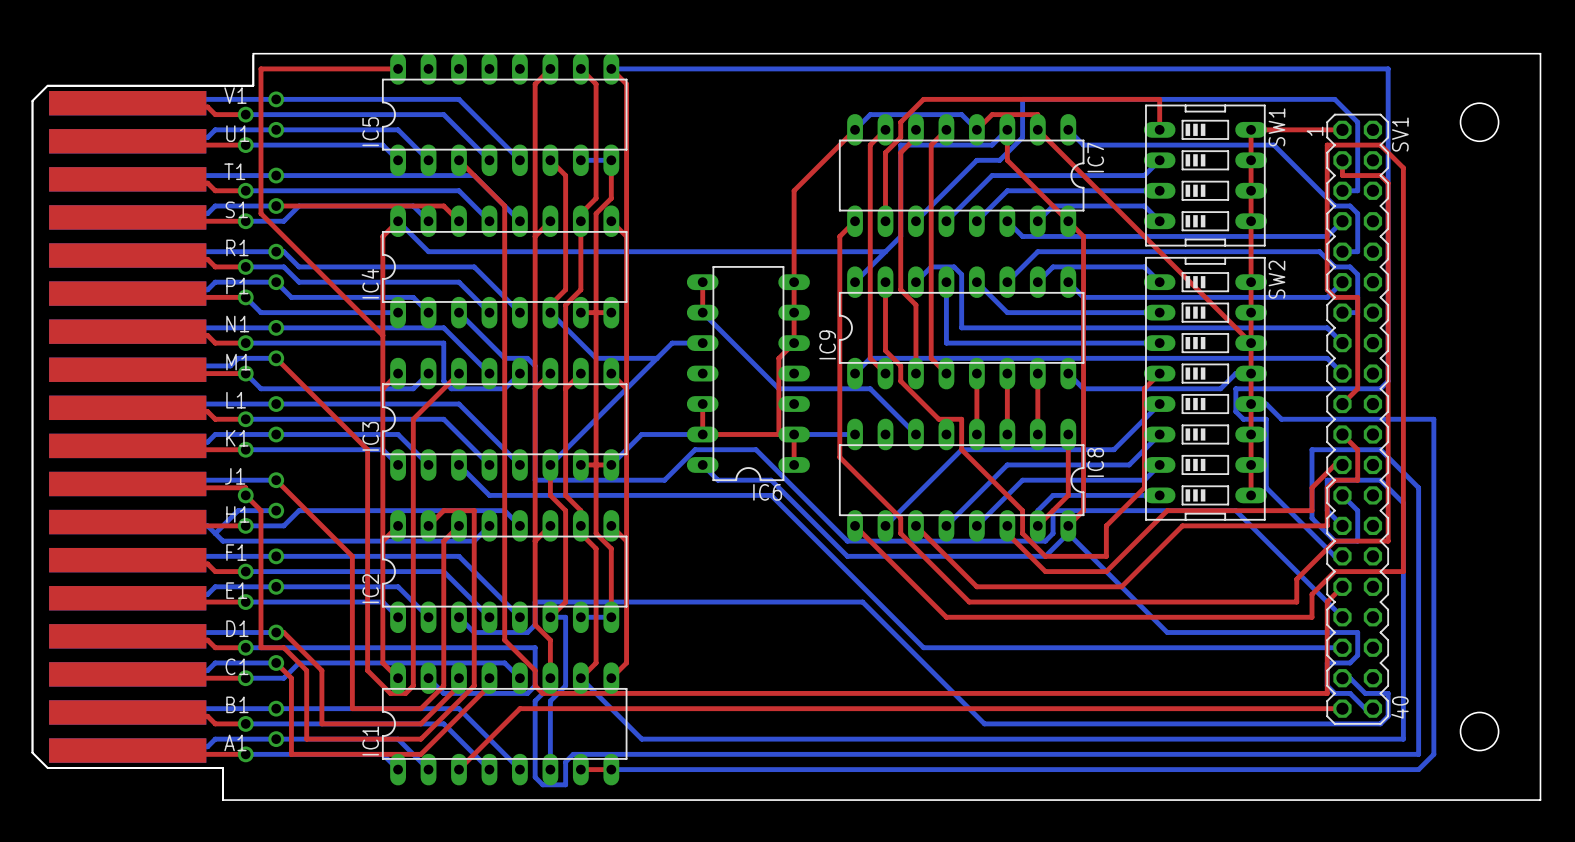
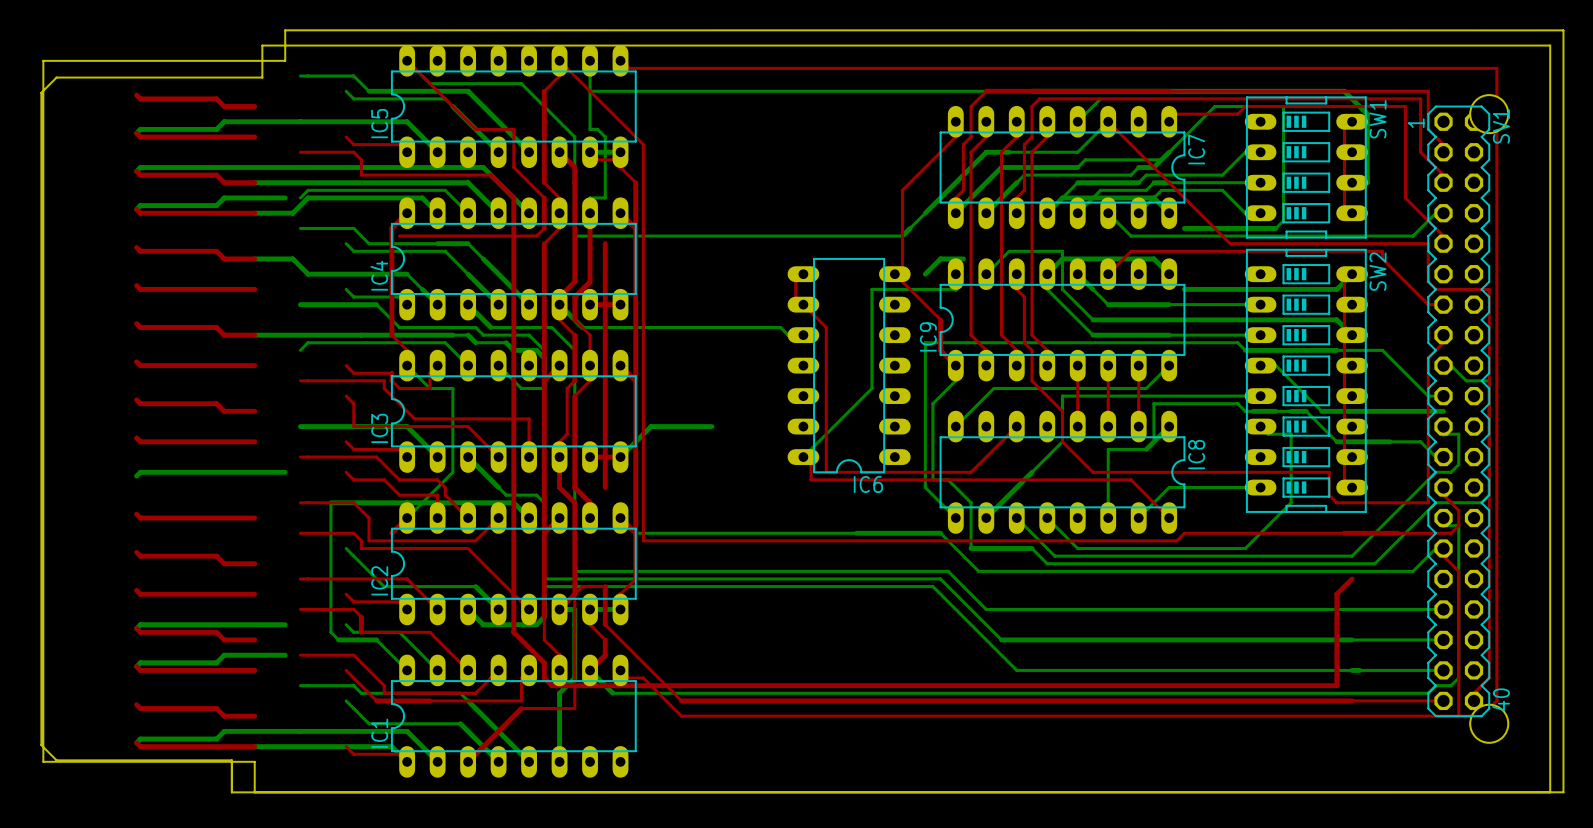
board edge: none -> (285, 30) (1563, 30) (1563, 792) (254, 792) (254, 761) (43, 761) (43, 60) (285, 60) (285, 30)
top track: (398, 68) (260, 68) (260, 213) (382, 335) -> none
top track: (550, 68) (535, 84) (535, 99) -> none
bottom track: none -> (590, 60) (590, 129) (597, 129) (605, 137) (605, 197) (590, 197) (590, 213)
top track: (580, 68) (596, 84) (596, 198) (580, 213) (580, 221) -> none
bottom track: (611, 68) (1388, 68) (1388, 381) (1380, 388) (1235, 388) (1235, 411) (1243, 419) -> (1153, 441) (1153, 403) (1237, 403) (1245, 411) (1253, 411)
top track: (618, 76) (626, 84) (626, 190) -> (628, 68) (1496, 68) (1496, 700) (1481, 716) (681, 716) (643, 678) (628, 678) (620, 670)
bottom track: (359, 99) (131, 99) (127, 103) -> (369, 91) (353, 76) (300, 76)
bottom track: none -> (590, 91) (1032, 91)
top track: (976, 99) (923, 99) (900, 122) (900, 137) (885, 152) (885, 221) -> (986, 91) (971, 106) (971, 137) (963, 144) (963, 190) (955, 197) (955, 213)
bottom track: (1022, 99) (1022, 137) (999, 160) -> (1108, 121) (1077, 152) (1009, 152)
top track: (1159, 99) (1159, 129) -> (1169, 91) (1428, 91) (1428, 129) (1443, 144) (1443, 152)
bottom track: (245, 114) (443, 114) -> (346, 91) (353, 98) (445, 98) (452, 106)
bottom track: (855, 129) (870, 114) (961, 114) (976, 129) -> none
top track: (855, 129) (794, 190) (794, 343) (778, 358) (778, 434) -> none
top track: (885, 129) (870, 145) (870, 358) (885, 373) -> none
top track: (915, 129) (915, 137) (900, 152) (900, 289) (915, 305) (915, 373) -> none
top track: (946, 129) (931, 145) (931, 327) -> (955, 121) (955, 137) (902, 190) (902, 266) (894, 274) (940, 319)
top track: (976, 129) (992, 114) (1037, 114) (1037, 129) (1251, 343) -> (986, 121) (986, 137) (971, 152) (971, 335) (986, 350) (986, 365)
bottom track: (1007, 129) (992, 145) (900, 145) (900, 236) -> (925, 213) (910, 228)
bottom track: (1068, 129) (1083, 145) (1273, 145) (1334, 206) (1350, 206) (1357, 213) (1357, 251) (1342, 251) -> (1077, 121) (1100, 98)
top track: none -> (1108, 121) (1230, 243) (1428, 243) (1428, 281) (1435, 289) (1489, 289) (1489, 678) (1473, 693) (1473, 700)
top track: none -> (1169, 121) (1176, 114) (1237, 114) (1245, 106) (1405, 106) (1405, 197) (1443, 236) (1443, 243)
top track: (1342, 129) (1251, 129) (1251, 495) -> (1352, 121) (1344, 129) (1344, 144) (1352, 152) (1344, 159) (1344, 175) (1352, 182) (1344, 190) (1344, 205) (1352, 213)
bottom track: (245, 145) (382, 145) (398, 160) -> none
top track: none -> (346, 137) (353, 144) (399, 144) (407, 152)
top track: (1007, 145) (1007, 160) (1083, 236) (1083, 510) (1068, 525) -> (1016, 137) (1001, 152) (1001, 335) (1016, 350) (1016, 365)
top track: (459, 160) (481, 183) -> (300, 152) (353, 152) (361, 159) (361, 175) (490, 175)
top track: none -> (590, 152) (597, 159) (612, 159) (620, 152)
bottom track: none -> (1260, 152) (1245, 152) (1222, 175) (1146, 175) (1138, 182)
top track: (1342, 160) (1342, 175) (1380, 175) (1388, 183) (1388, 541) -> (1443, 487) (1443, 495) (1458, 510) (1458, 525) (1451, 533) (1397, 533)
top track: (611, 175) (611, 198) (596, 213) (596, 251) -> (620, 167) (635, 182)
IC7 position: (961, 175) -> (1062, 167)
bottom track: (1068, 175) (1129, 175) -> (1077, 167) (1085, 159) (1161, 159)
bottom track: none -> (1138, 167) (1131, 175) (1024, 175) (1016, 182)
SW1 position: (1205, 175) -> (1306, 167)
top track: (535, 190) (535, 206) -> (407, 60) (475, 129) (513, 129) (513, 167) (544, 197)
bottom track: (1007, 190) (1068, 190) -> (1062, 197) (1077, 182)
bottom track: (1129, 190) (1144, 190) -> (1077, 213) (1100, 190) (1146, 190) (1153, 182)
bottom track: none -> (1169, 182) (1260, 182)
top track: none -> (1443, 182) (1443, 175) (1420, 152) (1420, 98) (1039, 98) (1032, 106) (1032, 137) (1024, 144) (1024, 190) (1016, 197) (1016, 213)
top track: (276, 206) (443, 206) (459, 221) -> none
bottom track: none -> (300, 197) (308, 190) (445, 190) (468, 213)
bottom track: (398, 221) (428, 251) -> (300, 228) (353, 228) (369, 243) (437, 243)
top track: (550, 221) (535, 236) (535, 251) -> (544, 182) (559, 197) (559, 228) (544, 243)
top track: (855, 221) (839, 236) (839, 457) (900, 518) (900, 533) (969, 602) (1296, 602) (1296, 579) (1334, 541) -> (544, 91) (559, 76) (559, 60) (643, 144) (643, 540) (1176, 540) (1184, 533) (1344, 533)
bottom track: (1007, 221) (1022, 236) (1174, 236) -> none
bottom track: none -> (1108, 213) (1131, 236) (1413, 236) (1435, 213) (1443, 213)
bottom track: none -> (1138, 213) (1161, 190) (1222, 190) (1245, 213) (1260, 213)
bottom track: (1342, 221) (1327, 236) (1266, 236) -> (1169, 152) (1214, 106) (1283, 106) (1283, 220) (1275, 228)
top track: none -> (544, 228) (536, 236) (399, 236)
bottom track: (893, 244) (855, 282) -> (902, 236) (574, 236) (574, 137) (521, 83) (430, 83) (407, 60)
bottom track: none -> (346, 243) (353, 251) (445, 251) (468, 274)
bottom track: (459, 251) (885, 251) -> none
bottom track: (127, 255) (131, 251) (283, 251) (299, 266) (474, 266) -> (468, 243) (483, 258)
bottom track: (954, 266) (961, 274) (961, 327) (1083, 327) -> none
bottom track: (398, 282) (459, 282) -> (407, 274) (422, 289)
top track: (702, 282) (702, 312) -> none
top track: (885, 282) (885, 350) (900, 365) (900, 381) (938, 419) (961, 419) (961, 449) (1022, 510) (1022, 533) (1045, 556) (1106, 556) (1106, 525) (1144, 487) (1144, 388) (1159, 373) -> none
bottom track: (976, 282) (1007, 312) (1098, 312) -> (986, 274) (1009, 251) (1062, 251) (1062, 289) (1092, 319)
bottom track: (1007, 282) (1037, 251) (1319, 251) (1334, 266) (1350, 266) (1357, 274) (1357, 312) (1342, 312) -> none
top track: none -> (1016, 274) (1016, 289) (1024, 297) (1024, 342) (1032, 350) (1032, 380) (1062, 411) (1062, 441) (1092, 472) (1329, 472) (1329, 495) (1336, 502) (1428, 502) (1428, 357) (1443, 342) (1443, 335)
top track: none -> (1108, 274) (1131, 251) (1382, 251) (1382, 258) (1428, 304) (1443, 304)
top track: none -> (1352, 274) (1344, 281) (1344, 297) (1352, 304) (1344, 312) (1344, 327) (1352, 335) (1344, 342) (1344, 357) (1352, 365) (1344, 373) (1344, 388) (1352, 396) (1344, 403) (1344, 418) (1352, 426) (1344, 434) (1344, 449) (1352, 457) (1344, 464) (1344, 479) (1352, 487)
bottom track: (127, 293) (131, 289) (207, 289) (215, 282) (276, 282) (291, 297) (413, 297) -> none
bottom track: (245, 297) (260, 312) (291, 312) -> none
bottom track: (946, 297) (946, 343) (1083, 343) -> (1047, 274) (1047, 289) (1092, 335)
bottom track: none -> (955, 289) (871, 289) (871, 388) (803, 457)
bottom track: (1083, 297) (1174, 297) -> (1092, 289) (1108, 304)
bottom track: (367, 312) (398, 312) -> (346, 289) (353, 297) (399, 297) (407, 304)
bottom track: none -> (376, 304) (399, 327) (475, 327) (483, 335) (529, 335) (544, 350) (544, 357)
bottom track: (702, 312) (778, 388) (870, 388) (915, 434) -> none
bottom track: none -> (1169, 304) (1260, 304)
top track: (565, 327) (565, 343) -> (559, 304) (559, 319) (574, 335)
IC9 position: (961, 327) -> (1062, 319)
bottom track: (127, 331) (131, 327) (443, 327) (459, 343) -> none
bottom track: (481, 335) (497, 350) -> (475, 342) (506, 342)
bottom track: none -> (490, 327) (551, 327) (574, 350) (574, 571) (948, 571) (986, 609) (1443, 609)
bottom track: (573, 335) (596, 358) (657, 358) -> (582, 327) (780, 327) (788, 335) (803, 335)
top track: (382, 343) (382, 381) -> (391, 335) (407, 350) (407, 365)
bottom track: (443, 343) (443, 381) (451, 388) (504, 388) (519, 373) -> (452, 335) (468, 335)
bottom track: (702, 343) (672, 343) (550, 464) -> none
bottom track: none -> (1169, 335) (1260, 335)
bottom track: (466, 350) (489, 373) -> (544, 388) (521, 388) (498, 365)
bottom track: (276, 358) (238, 358) (230, 365) (131, 365) (127, 369) -> none
top track: (276, 358) (367, 449) (367, 670) (390, 693) (405, 693) (413, 685) (413, 419) (459, 373) -> none
bottom track: none -> (300, 350) (308, 342) (445, 342) (468, 365)
bottom track: (1235, 358) (870, 358) (855, 373) -> none
bottom track: (1327, 358) (1342, 373) -> (1336, 350) (1382, 350) (1428, 396) (1443, 396)
bottom track: (245, 373) (260, 388) (413, 388) (428, 373) -> none
top track: none -> (346, 365) (353, 373) (391, 373)
bottom track: none -> (407, 365) (430, 388) (452, 388) (452, 472) (407, 518) (407, 502)
top track: (398, 373) (382, 388) (382, 662) (398, 678) -> none
top track: none -> (437, 365) (430, 373) (430, 388) (399, 388) (391, 380)
top track: (580, 373) (565, 388) (565, 404) -> (574, 319) (590, 335) (590, 380) (574, 396)
IC6 position: (748, 373) -> (849, 365)
top track: (976, 373) (976, 434) -> (1108, 365) (1108, 426)
top track: (1007, 373) (1007, 434) -> (803, 274) (795, 281) (795, 297) (826, 327) (826, 472) (971, 472) (1016, 426)
top track: (1037, 373) (1037, 434) -> (1047, 365) (1047, 350) (1032, 335) (1032, 152) (1047, 137) (1047, 121)
bottom track: (1068, 373) (1083, 388) (1220, 388) (1235, 373) (1251, 373) -> (1321, 411) (1275, 365) (1260, 365)
top track: none -> (1138, 365) (1138, 426)
bottom track: none -> (1169, 365) (1146, 388) (993, 388) (955, 426)
top track: none -> (300, 380) (384, 380) (384, 388) (414, 418) (529, 418) (529, 457)
top track: none -> (574, 380) (567, 388) (567, 434) (559, 441) (559, 457)
SW2 position: (1205, 388) -> (1306, 380)
bottom track: (535, 396) (535, 480) (664, 480) (695, 449) (756, 449) (847, 541) -> (620, 518) (635, 533) (856, 533)
top track: none -> (346, 396) (353, 403) (353, 426) (468, 426) (498, 457)
top track: (702, 404) (702, 434) (794, 434) (794, 464) -> (1169, 518) (1131, 479) (811, 479) (811, 464) (803, 457)
bottom track: (1159, 404) (1113, 449) (961, 449) (885, 525) -> none
bottom track: (1251, 404) (1266, 404) (1281, 419) -> (1275, 411) (1291, 411)
top track: (1342, 404) (1357, 388) (1357, 297) (1334, 297) (1327, 289) (1327, 145) (1380, 145) (1403, 167) (1403, 571) (1334, 571) (1312, 594) (1312, 617) (946, 617) (855, 525) -> none
bottom track: (127, 407) (131, 404) (459, 404) (519, 464) -> none
bottom track: (245, 419) (443, 419) (489, 464) -> none
bottom track: (1266, 419) (1266, 487) (1334, 556) (1342, 556) -> none
bottom track: (1296, 419) (1312, 419) -> (1306, 411) (1336, 441)
SV1 position: (1357, 419) -> (1458, 411)
bottom track: (1433, 419) (1433, 434) -> none
part: (260, 426) -> none
part: (142, 427) -> none
bottom track: (291, 434) (215, 434) (207, 442) (131, 442) (127, 445) -> none
bottom track: (794, 434) (855, 434) -> none
top track: (1068, 434) (1068, 495) (1037, 525) -> (1077, 426) (1077, 365)
top track: (1342, 434) (1357, 449) (1357, 480) (1334, 480) (1327, 487) (1327, 525) (1182, 525) (1121, 586) (976, 586) (915, 525) -> none
bottom track: (1433, 442) (1433, 525) -> (1443, 434) (1458, 434) (1458, 464) (1451, 472) (1435, 472) (1352, 556) (1054, 556) (1016, 518)
bottom track: (245, 449) (382, 449) (398, 464) -> none
top track: none -> (346, 441) (353, 449) (399, 449) (407, 457)
bottom track: (1327, 449) (1312, 449) (1312, 518) (1334, 541) (1357, 541) (1357, 510) (1342, 495) -> none
bottom track: (1380, 449) (1418, 487) (1418, 754) (573, 754) (565, 761) (565, 784) (542, 784) (535, 777) (535, 701) (550, 685) (550, 678) -> (1390, 441) (1420, 441) (1435, 457) (1443, 457)
bottom track: (1136, 457) (1129, 464) (1007, 464) (946, 525) -> (1245, 350) (1237, 342) (925, 342) (925, 487) (955, 518)
bottom track: none -> (1146, 449) (1108, 449) (1108, 518)
top track: none -> (300, 457) (376, 457) (399, 479) (437, 479) (445, 487) (445, 495) (468, 518)
bottom track: (702, 464) (717, 480) (771, 480) (847, 556) (961, 556) -> (955, 365) (955, 380) (932, 403) (932, 479) (948, 479) (971, 502) (971, 548)
bottom track: (1159, 464) (1144, 480) (1022, 480) -> (1260, 396) (1062, 396) (1062, 441) (1032, 472)
top track: (1342, 464) (1334, 464) (1312, 487) (1312, 510) (1167, 510) (1106, 571) (1045, 571) (1007, 533) (1007, 525) -> none
top track: (276, 480) (352, 556) (352, 624) -> (300, 609) (353, 609) (361, 617)
IC8 position: (961, 480) -> (1062, 472)
top track: (127, 483) (131, 487) (245, 487) (245, 495) (260, 510) (260, 647) (283, 647) (306, 670) (306, 739) (420, 739) (474, 685) (474, 510) (443, 510) (428, 525) -> (346, 472) (353, 479) (384, 479) (399, 495) (437, 495) (437, 518)
bottom track: (489, 495) (771, 495) (923, 647) (992, 647) -> (498, 487) (506, 495) (536, 495) (544, 502) (544, 578) (940, 578) (1001, 639)
top track: (596, 495) (596, 533) (611, 548) (611, 602) -> none
bottom track: (1159, 495) (1053, 495) (1037, 510) (1037, 525) -> (1260, 426) (1268, 434) (1291, 434) (1291, 502) (1245, 548) (1077, 548) (1047, 518)
bottom track: none -> (1260, 487) (1169, 487) (1138, 518)
bottom track: (276, 510) (238, 510) (215, 533) -> none
top track: none -> (300, 502) (353, 502) (369, 518) (369, 540) (475, 540) (498, 518)
bottom track: (321, 510) (299, 510) (283, 525) (245, 525) -> (330, 502) (330, 632) (338, 639)
bottom track: (127, 522) (131, 525) (207, 525) (222, 541) (474, 541) (489, 525) -> none
top track: (459, 525) (443, 541) (443, 685) (420, 708) -> (529, 670) (521, 678) (521, 700) (430, 700)
top track: (580, 525) (580, 533) (596, 548) (596, 594) -> (521, 708) (574, 708) (574, 594) (582, 586) (605, 586)
bottom track: (1342, 525) (1327, 510) (1327, 480) (1380, 480) (1403, 503) (1403, 739) (641, 739) (603, 701) -> none
bottom track: (1433, 533) (1433, 754) (1418, 769) (611, 769) -> (1443, 525) (1458, 525) (1458, 678) (1451, 685) (1435, 685) (1428, 693) (612, 693)
top track: none -> (300, 533) (353, 533) (361, 540) (361, 548) (468, 548) (529, 609)
bottom track: (931, 541) (1045, 541) (1053, 533) (1053, 510) (1235, 510) (1342, 617) -> (940, 533) (978, 571) (1413, 571) (1435, 548) (1443, 548)
bottom track: (1022, 556) (1045, 556) (1068, 533) (1167, 632) (1357, 632) (1357, 655) (1350, 662) (1327, 662) (1327, 685) (1334, 693) (1350, 693) (1365, 708) (1372, 708) -> (1032, 548) (1047, 563) (1374, 563) (1435, 502) (1481, 502) (1489, 495) (1489, 380) (1466, 380) (1451, 365) (1443, 365)
top track: none -> (1443, 548) (1443, 556) (1458, 571) (1458, 716)
bottom track: (127, 560) (131, 556) (459, 556) (519, 617) -> none
bottom track: (245, 571) (443, 571) (466, 594) -> (346, 548) (384, 586) (475, 586)
top track: none -> (300, 578) (407, 578) (437, 609)
top track: (626, 586) (626, 662) (611, 678) -> (635, 578) (620, 594)
bottom track: (127, 598) (131, 594) (207, 594) (215, 586) (398, 586) (428, 617) -> none
bottom track: (245, 602) (382, 602) (398, 617) -> none
top track: none -> (346, 594) (353, 601) (399, 601) (407, 609)
bottom track: (535, 602) (862, 602) (984, 723) (1380, 723) (1388, 716) (1388, 693) (1365, 693) (1350, 678) -> (544, 594) (544, 586) (932, 586) (1016, 670) (1352, 670)
top track: (535, 624) (550, 640) (550, 662) -> (544, 617) (544, 639) (559, 655)
top track: (276, 632) (283, 632) (321, 670) (321, 723) (420, 723) (459, 685) (459, 678) -> (361, 632) (430, 632) (468, 670)
bottom track: none -> (346, 624) (353, 632) (399, 632) (437, 670)
top track: (596, 632) (596, 647) -> (590, 609) (590, 624) (605, 639)
top track: (352, 640) (352, 708) (367, 708) -> (346, 670) (376, 700)
bottom track: (245, 647) (329, 647) -> none
bottom track: (367, 647) (535, 647) (535, 685) (527, 693) (443, 693) (428, 678) -> (376, 639) (407, 670)
bottom track: none -> (1352, 639) (1443, 639)
top track: (276, 662) (291, 678) (291, 754) (420, 754) (489, 685) (489, 678) -> (300, 655) (353, 655) (384, 685) (384, 693) (475, 693) (498, 670)
bottom track: (245, 678) (283, 678) (299, 662) (504, 662) (519, 678) -> none
bottom track: none -> (1359, 670) (1443, 670)
bottom track: (459, 708) (131, 708) (127, 712) -> (468, 700) (460, 693) (361, 693) (353, 685) (300, 685)
top track: (672, 708) (519, 708) (512, 716) -> (681, 700) (605, 624)
top track: none -> (1352, 700) (1443, 700)
bottom track: (245, 723) (443, 723) (451, 731) -> (346, 700) (369, 723) (460, 723)
top track: none -> (346, 746) (353, 754) (399, 754) (407, 761)
top track: (580, 769) (611, 769) -> none

